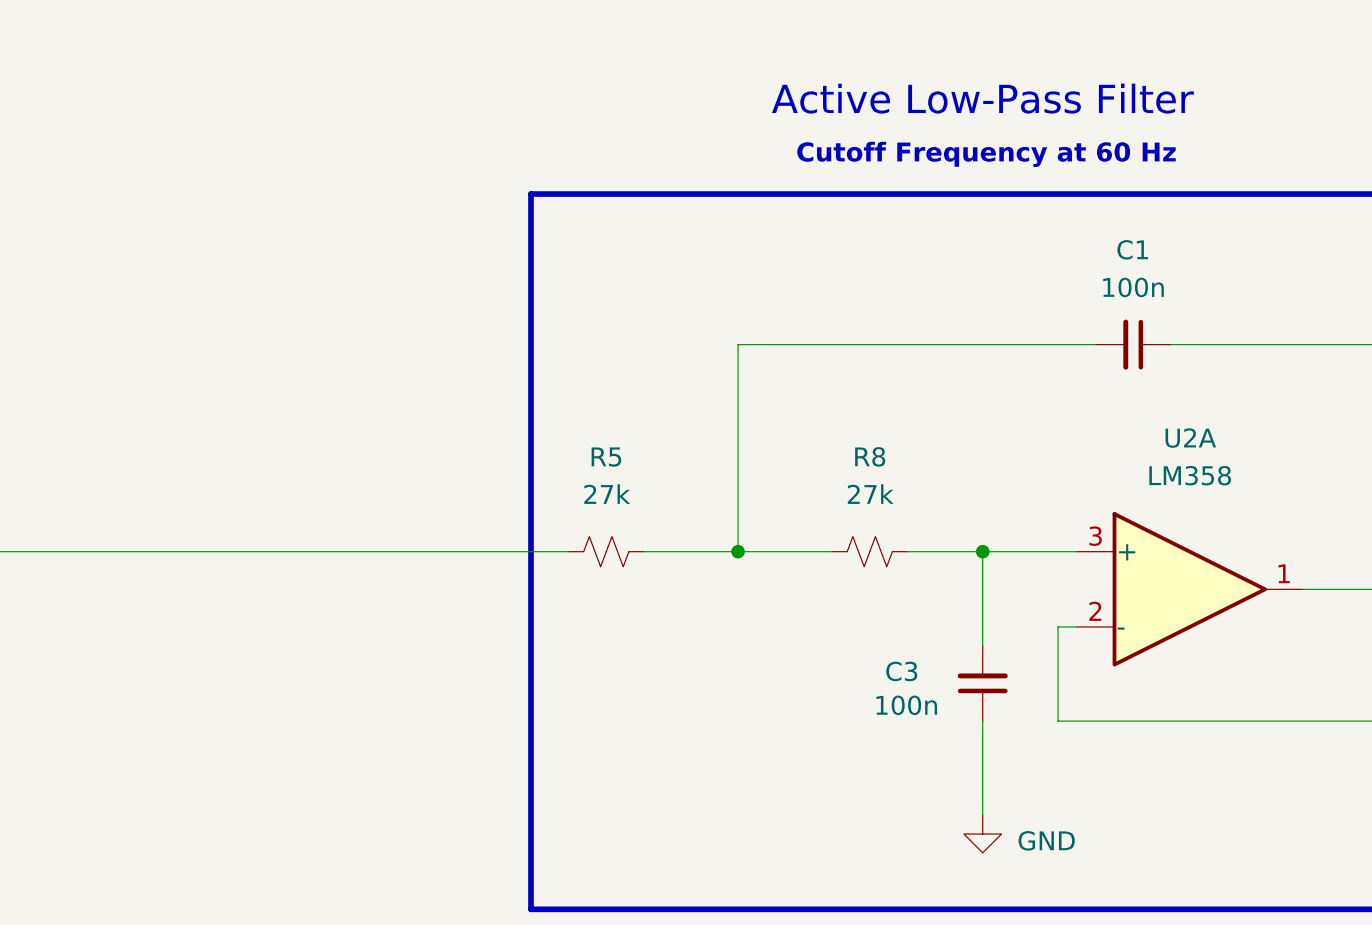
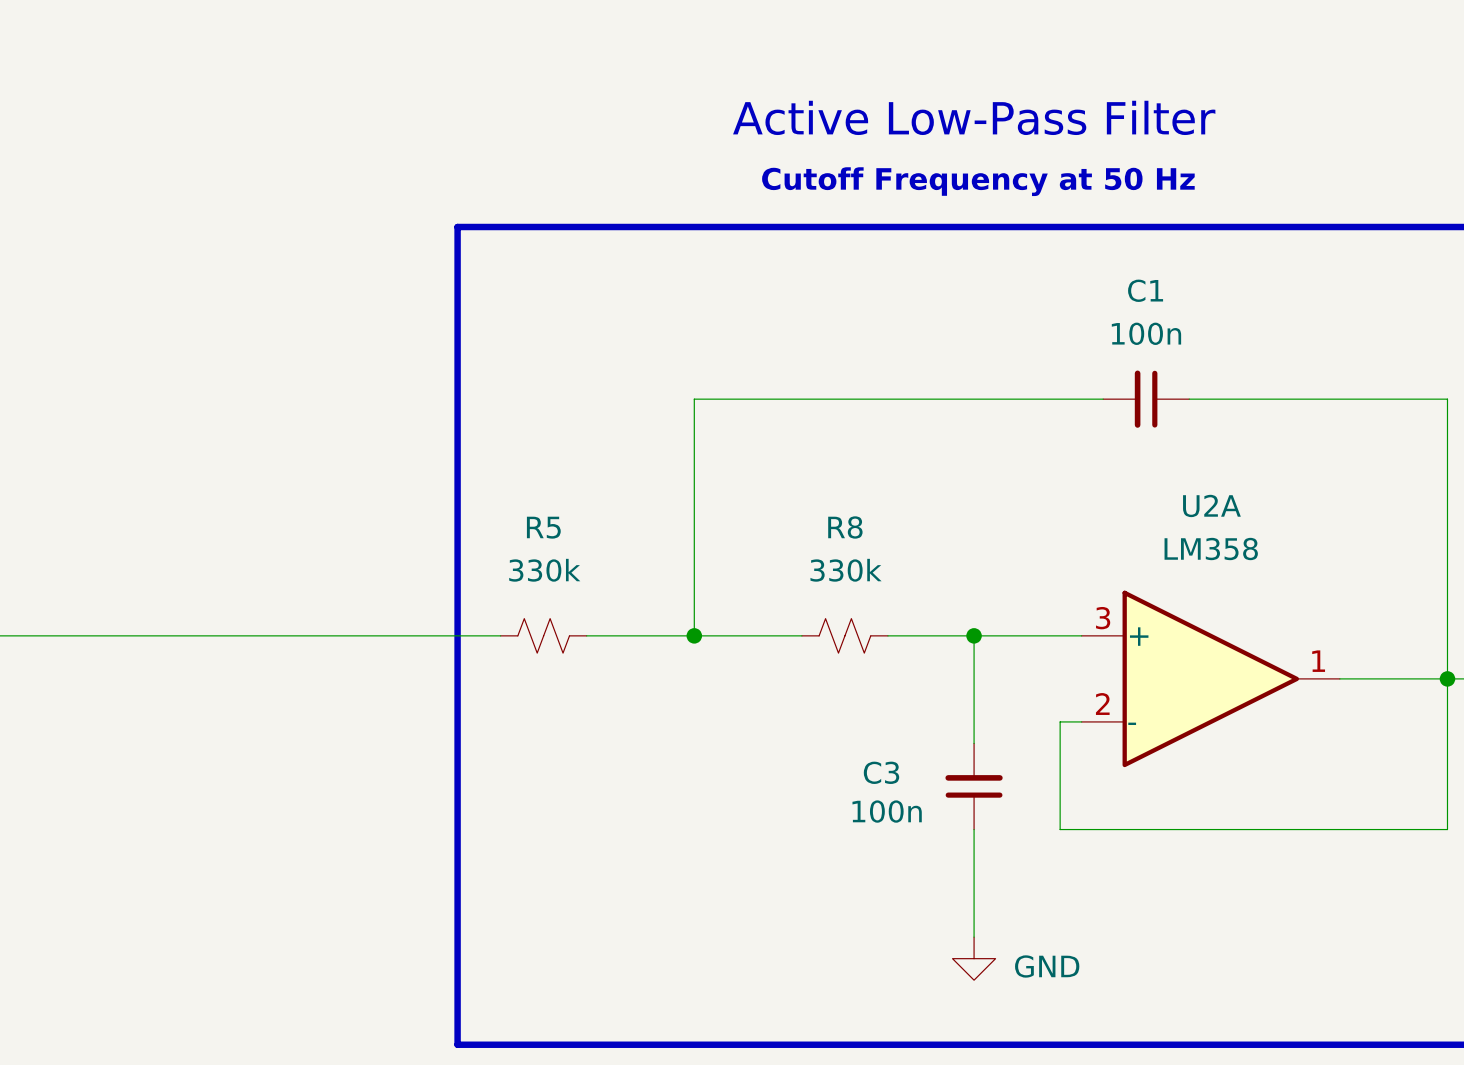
text: Cutoff Frequency at 60 Hz (986, 154) -> Cutoff Frequency at 50 Hz (978, 181)
R5 value: 27k (607, 494) -> 330k (544, 570)
R8 value: 27k (870, 494) -> 330k (846, 570)

